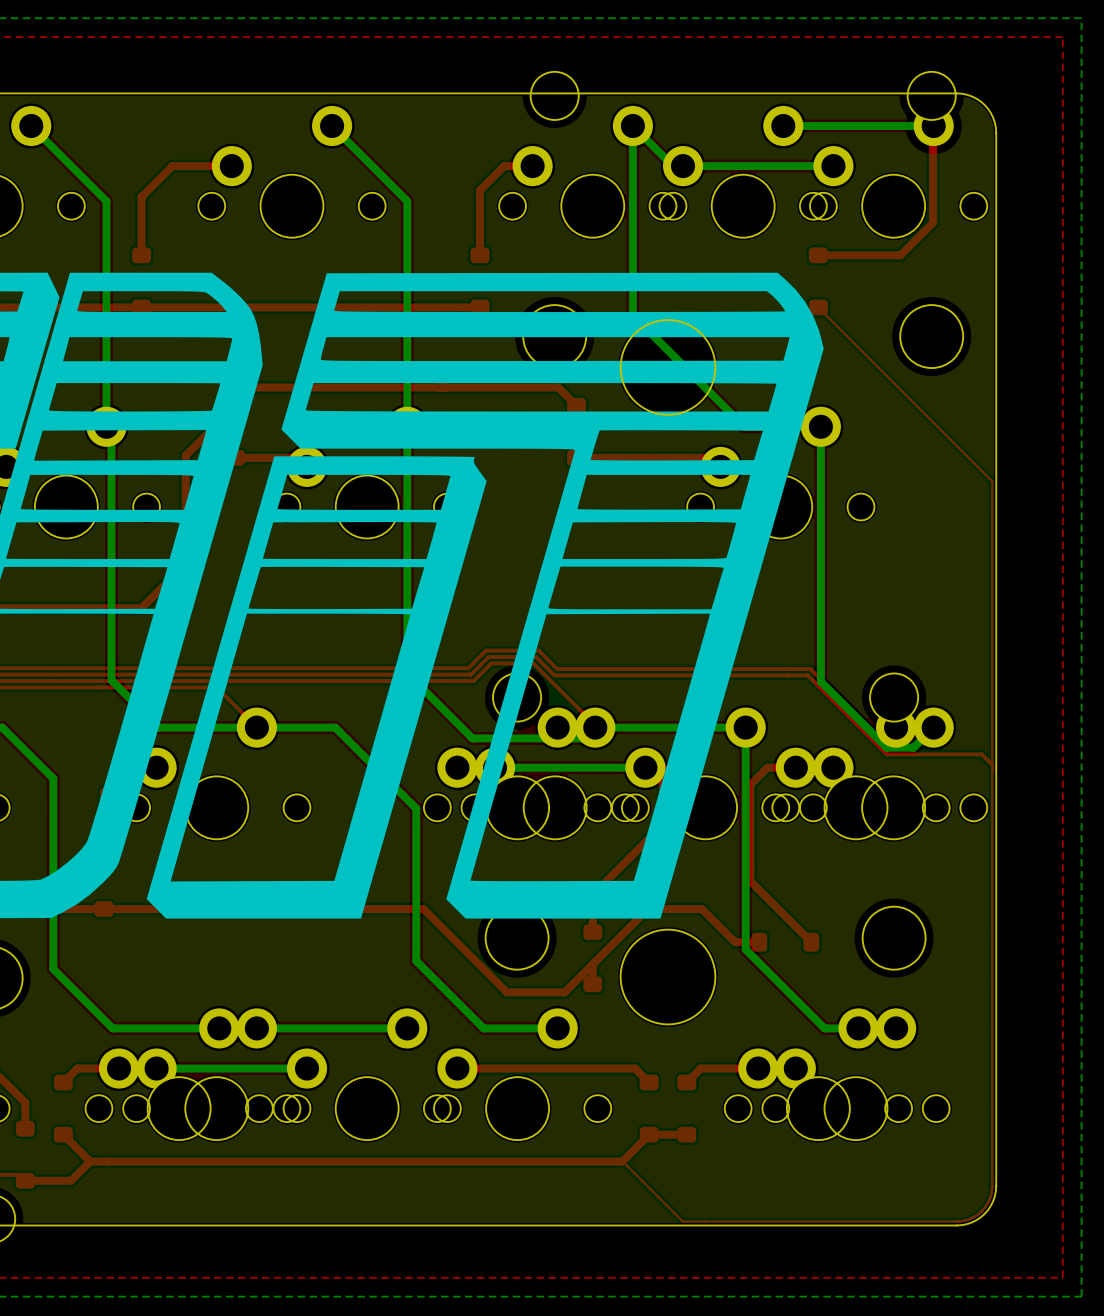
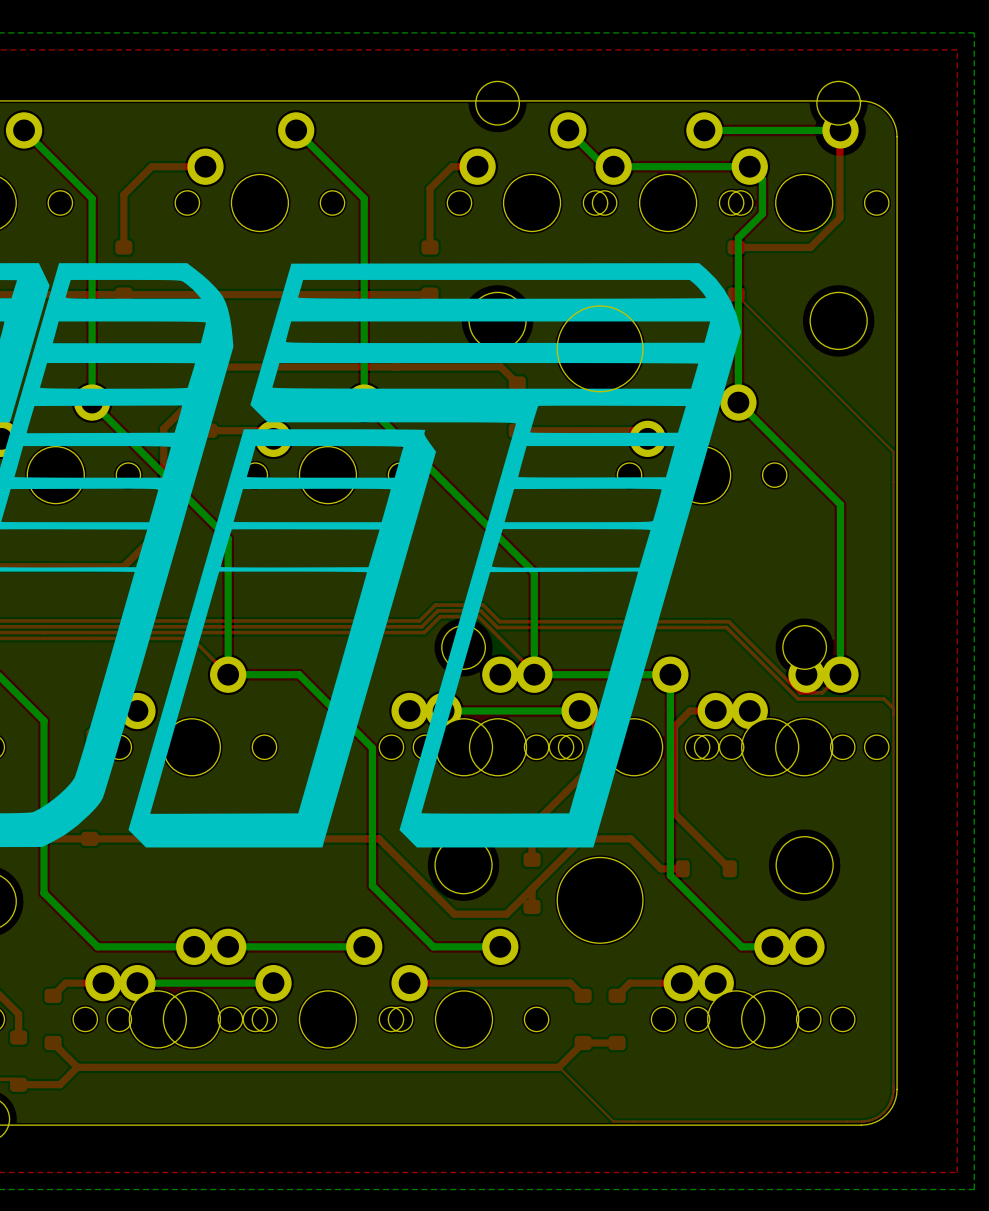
bottom track: (632, 125) (632, 315) (744, 426) (820, 426) (820, 681) (886, 747) (913, 747) (933, 727) -> (749, 166) (762, 179) (762, 213) (738, 237) (738, 402) (840, 504) (840, 674)
bottom track: (111, 426) (111, 680) (158, 727) (256, 727) -> (92, 402) (228, 538) (228, 674)
bottom track: (407, 426) (407, 673) (472, 738) (595, 738) -> (364, 402) (534, 572) (534, 674)

